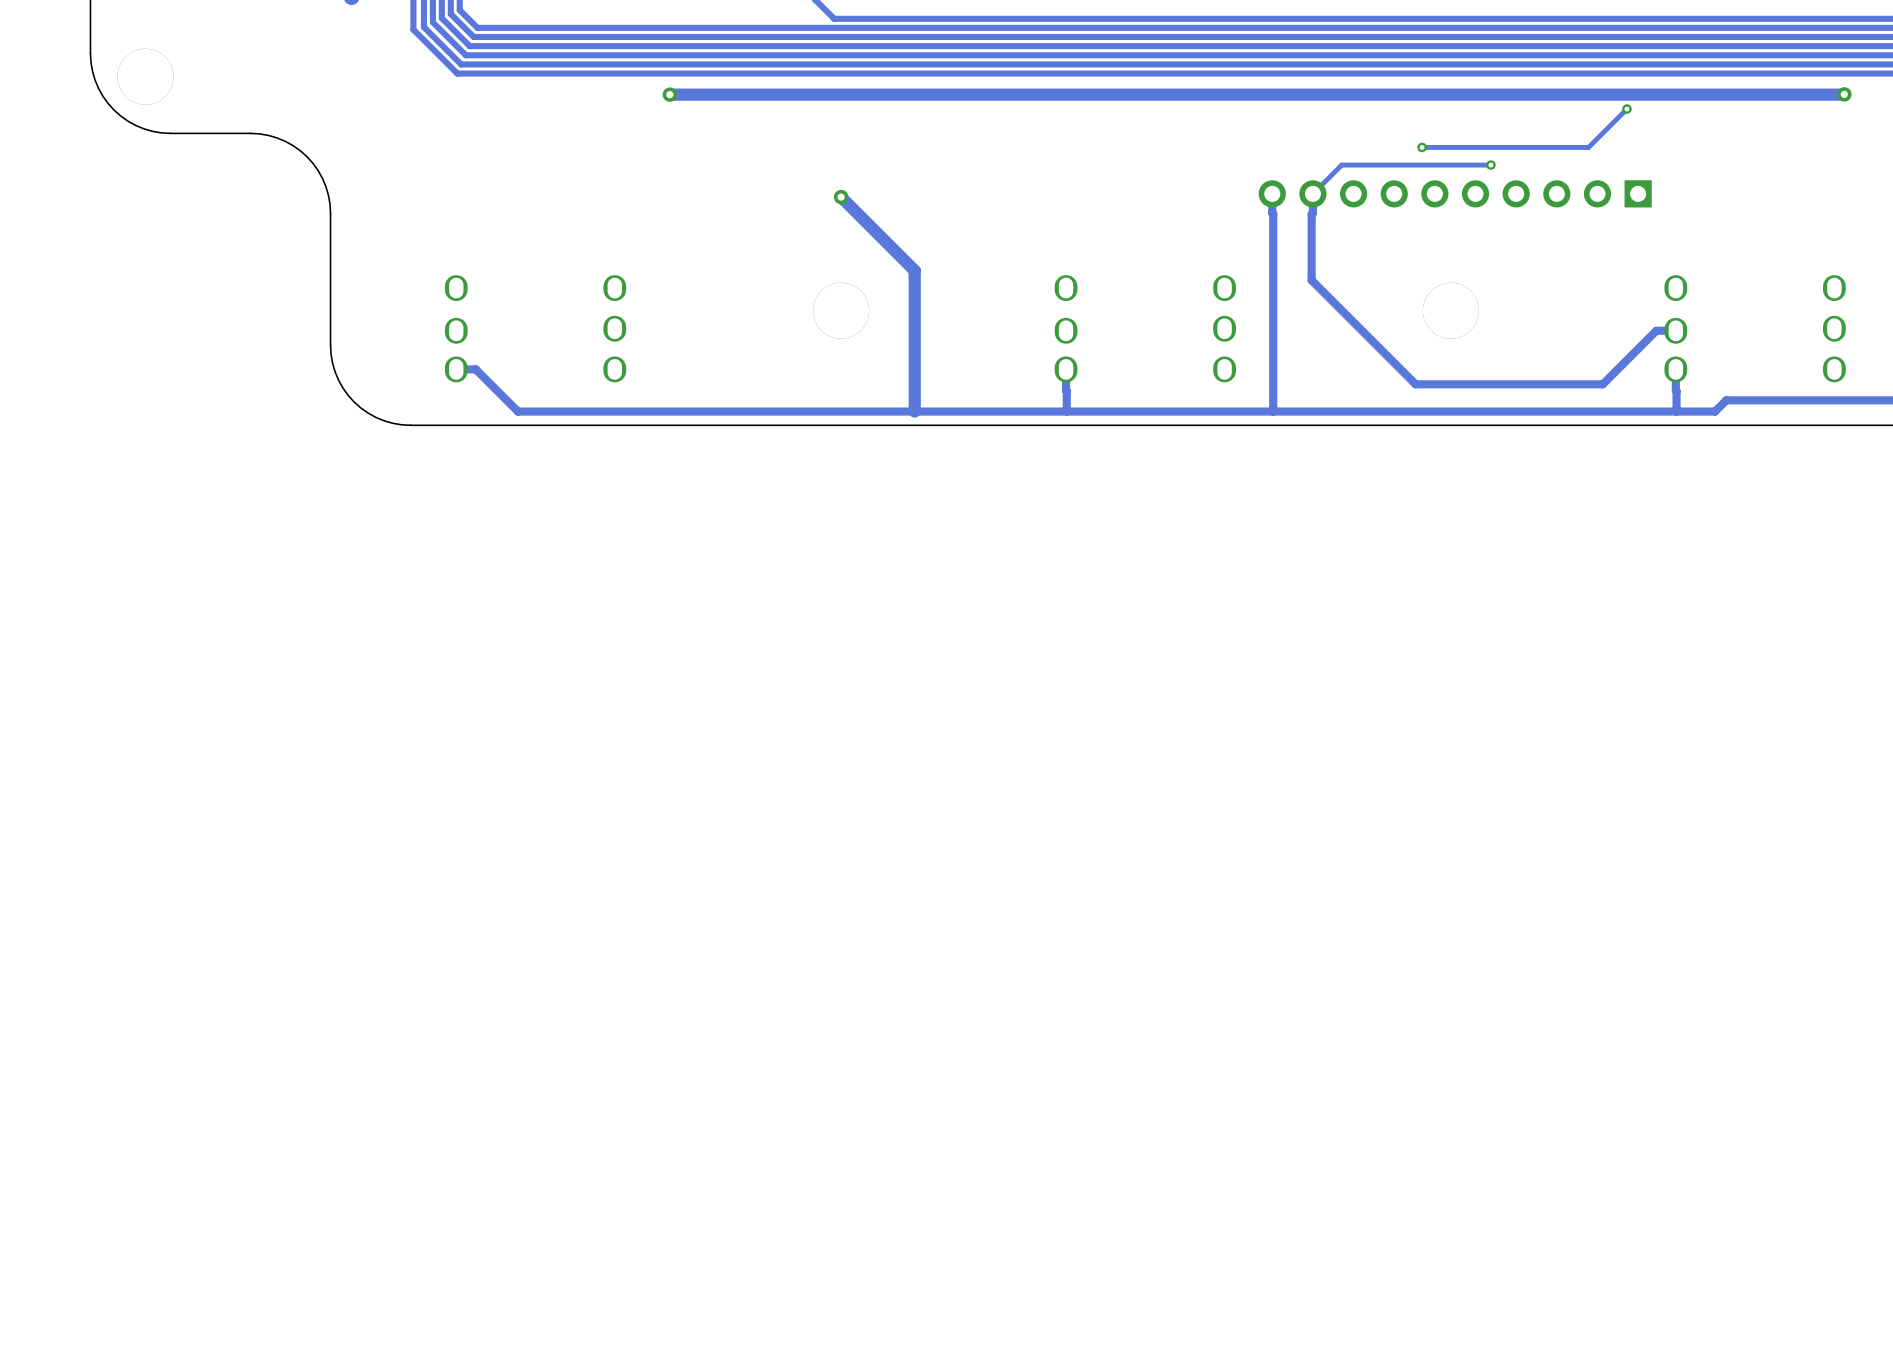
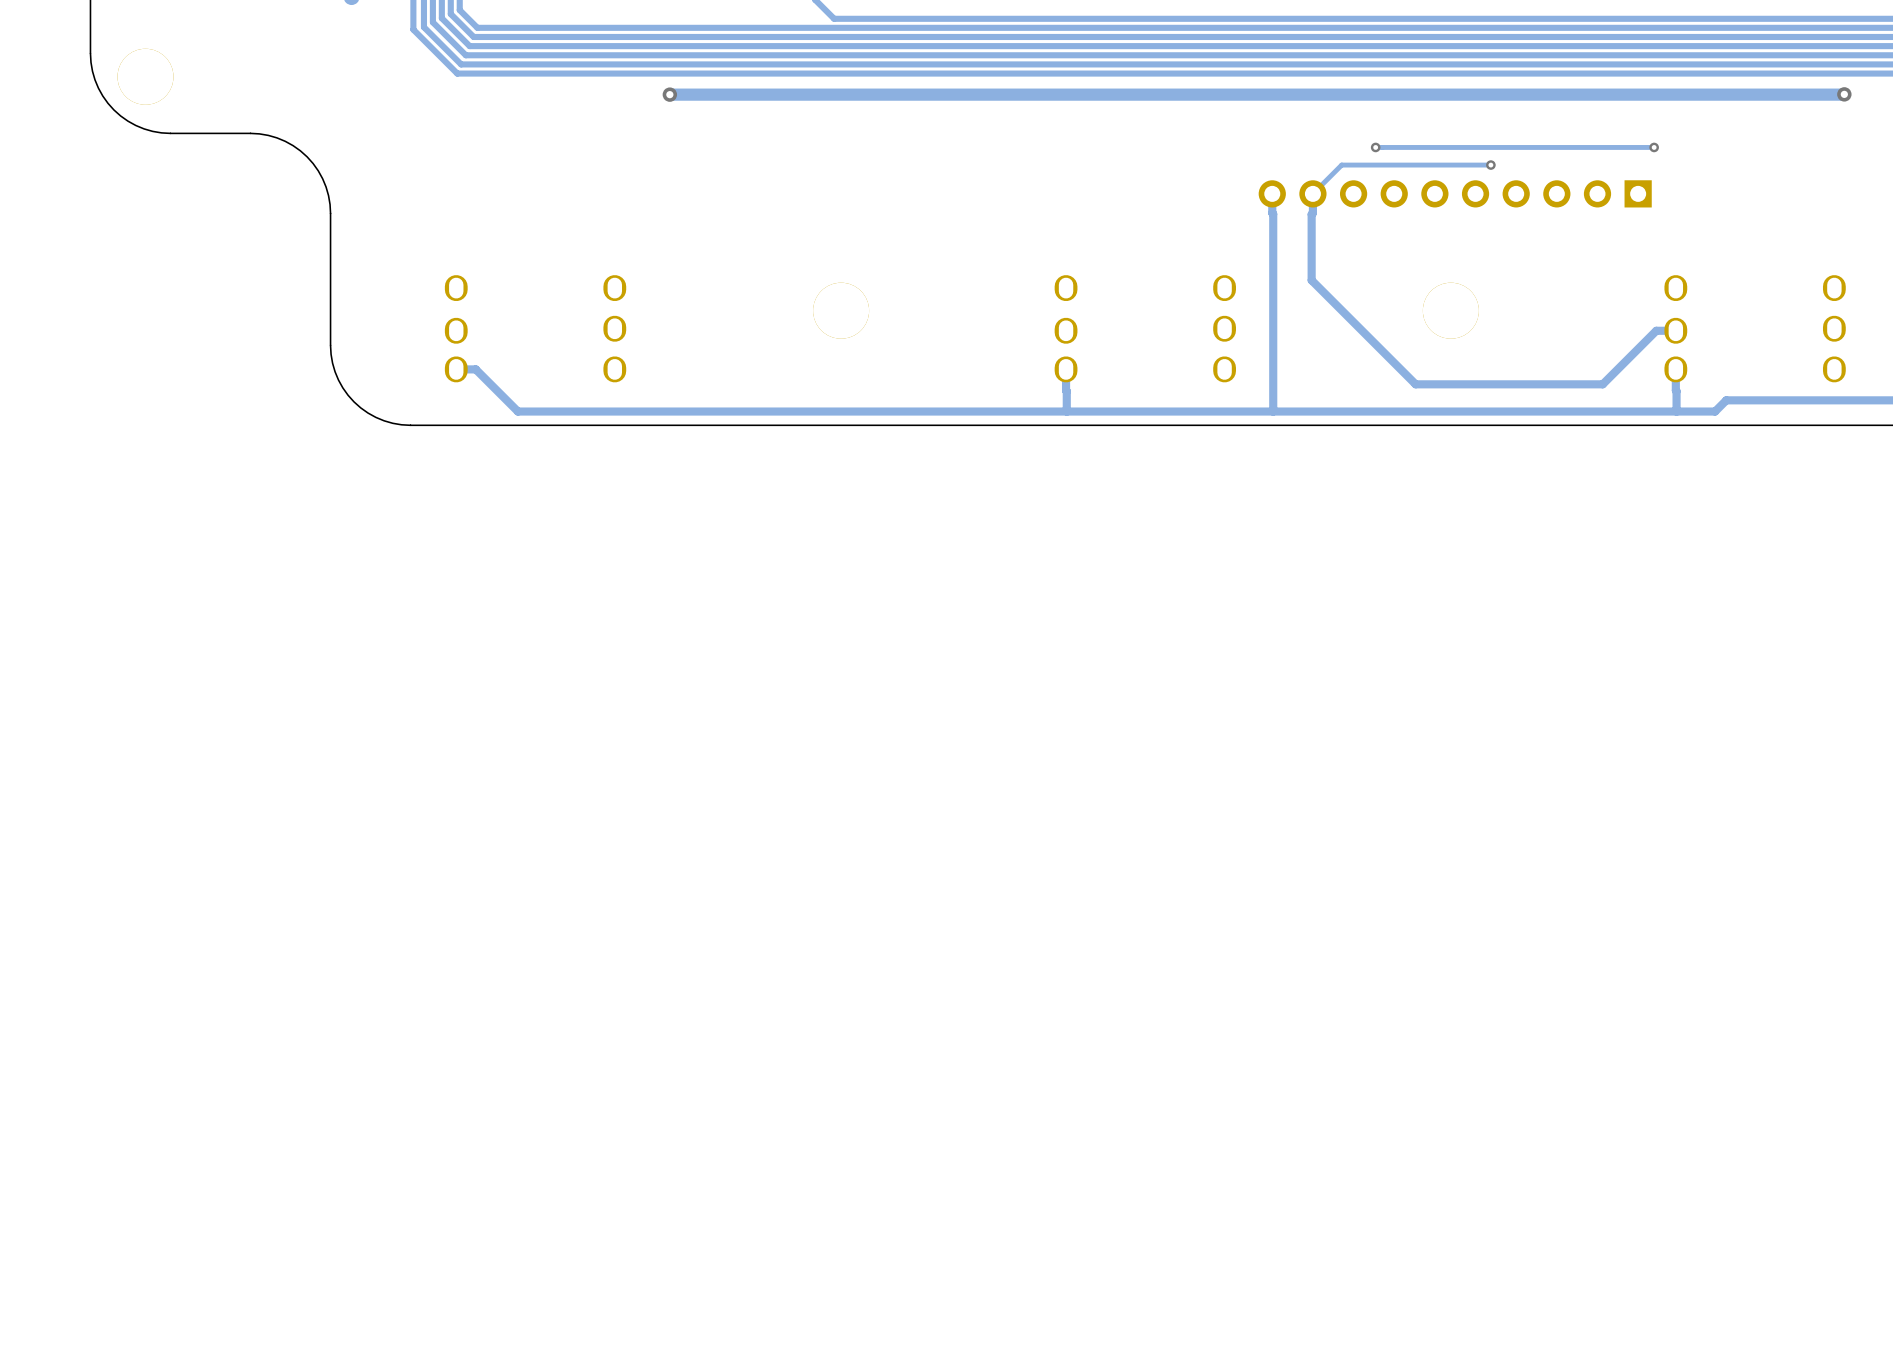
track: (1626, 109) (1588, 147) -> (1654, 147) (1588, 147)
via position: (1626, 109) -> (1654, 147)
track: none -> (1422, 147) (1375, 147)
via position: (1422, 147) -> (1375, 147)
track: (841, 197) (914, 270) (914, 411) -> none
via: (841, 197) -> none

